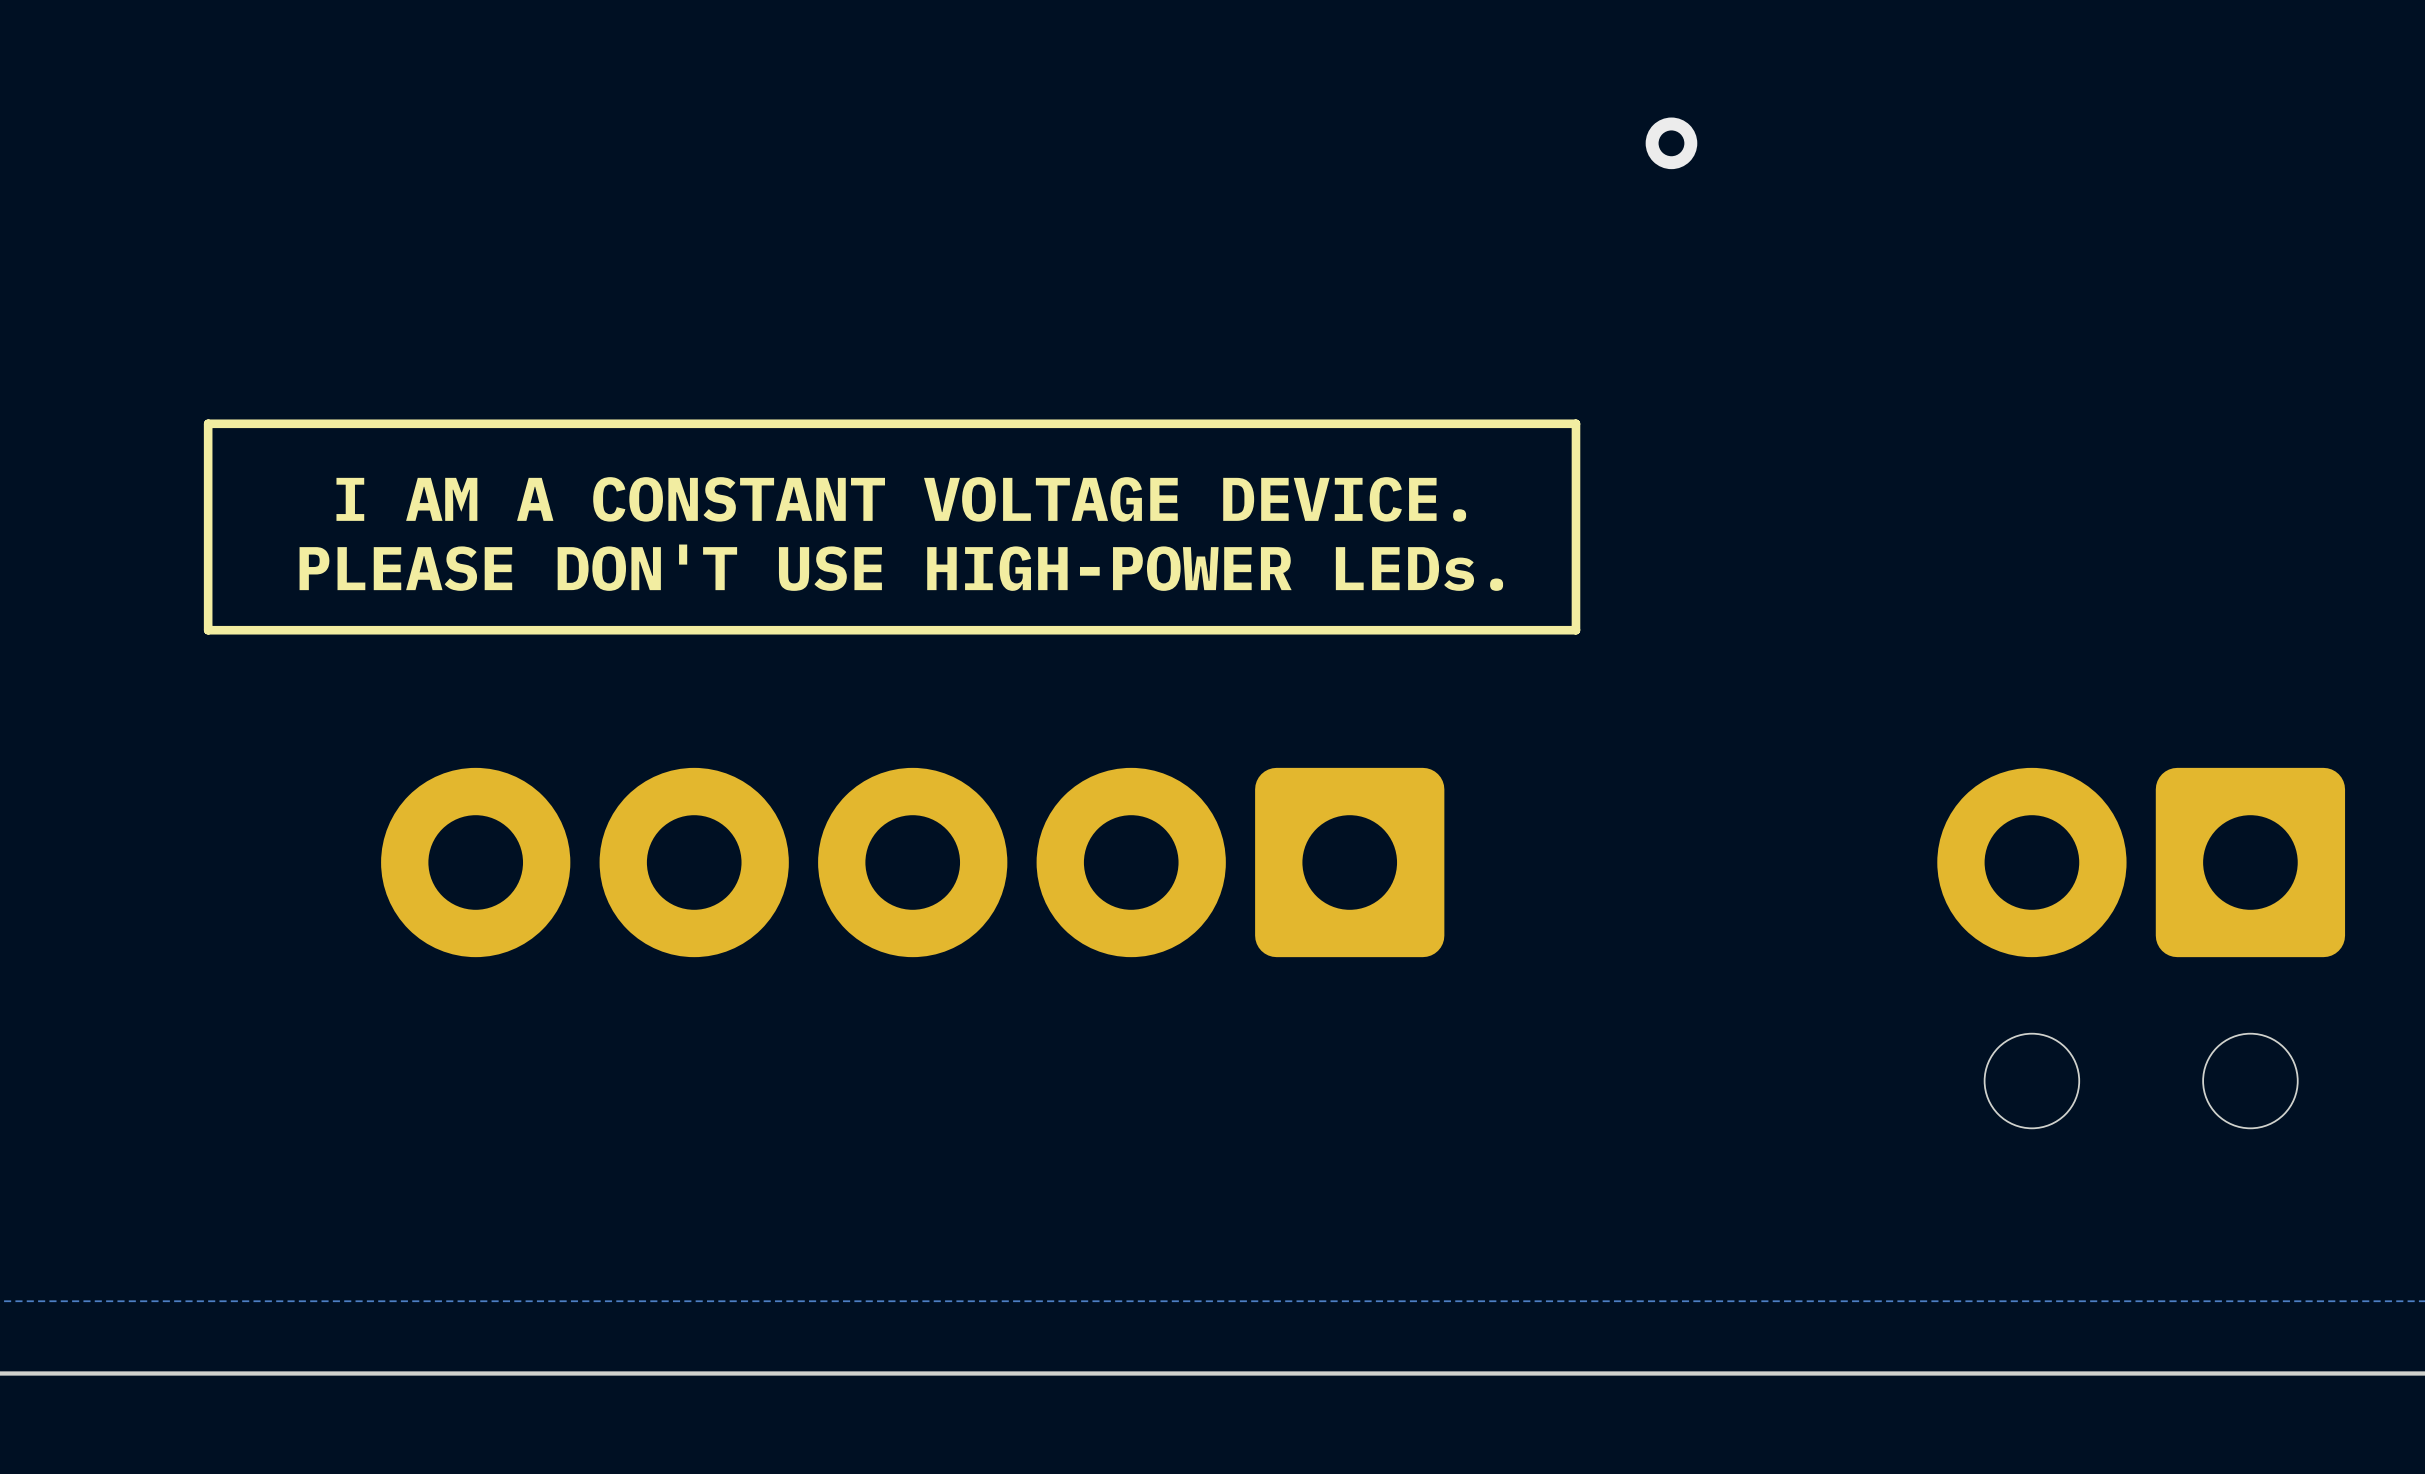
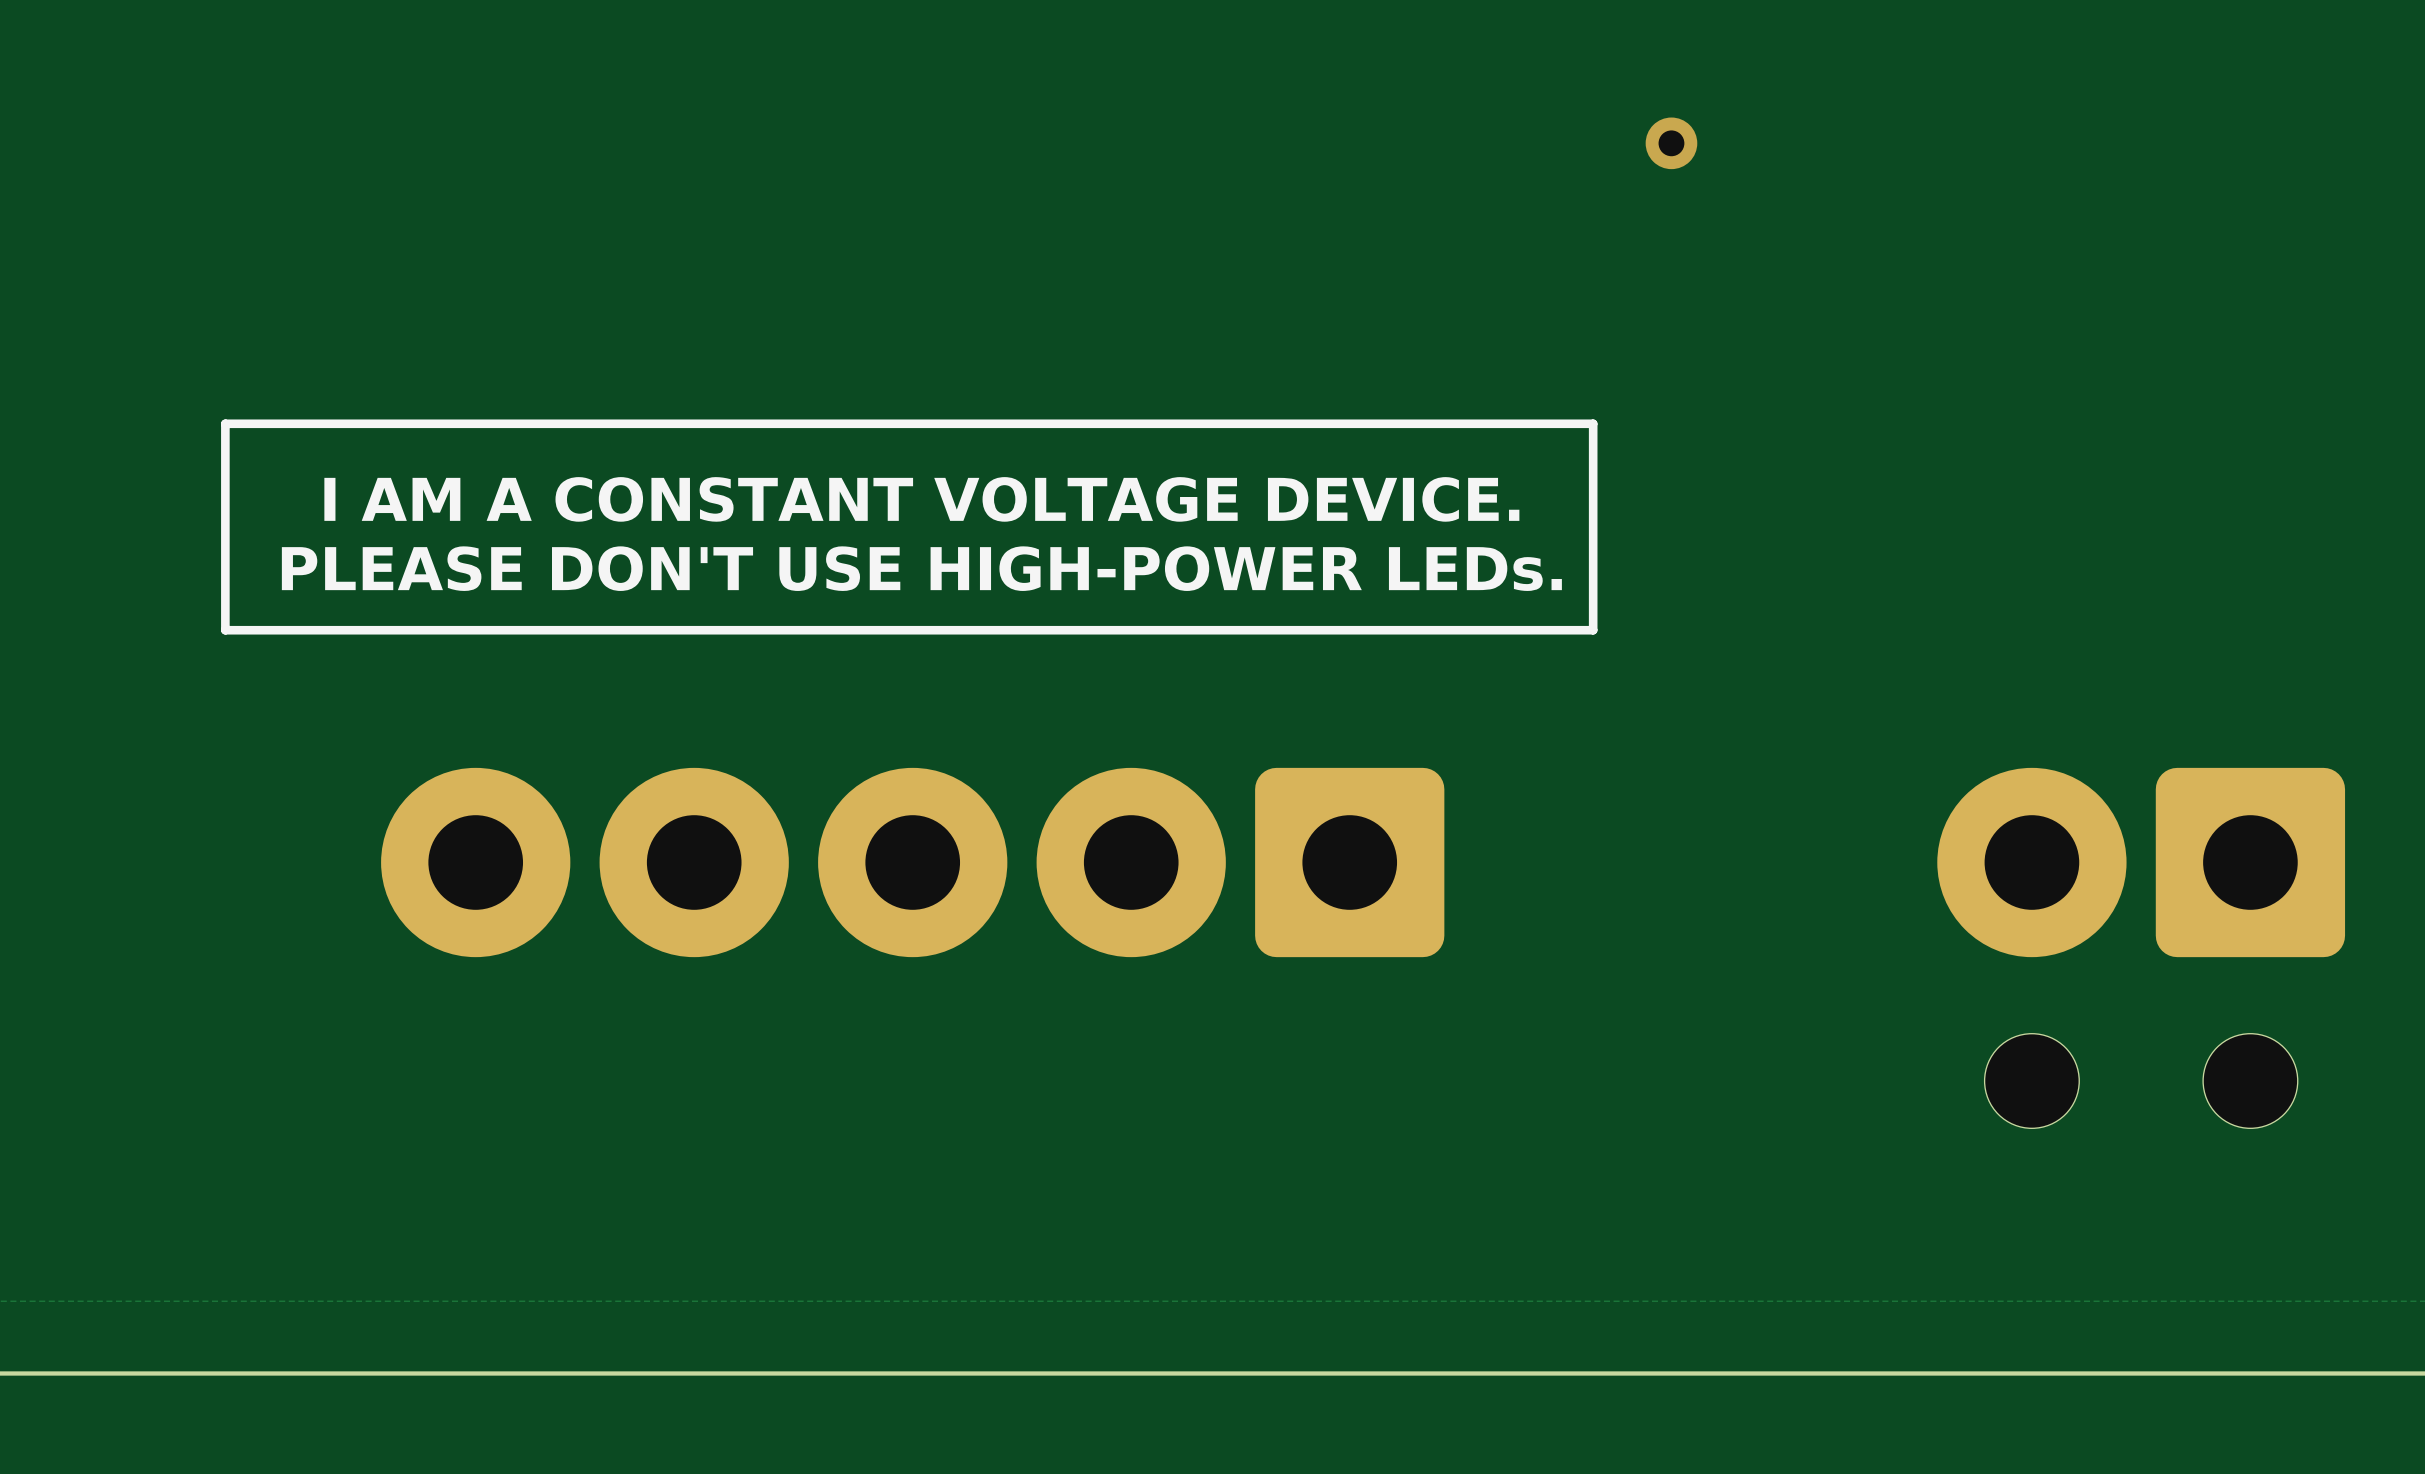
line: (225, 423) (208, 423) (208, 630) (225, 630) -> (225, 423) (225, 630)
line: (1575, 423) (1575, 630) -> (1575, 423) (1593, 423) (1593, 630) (1575, 630)
text position: I AM A CONSTANT VOLTAGE DEVICE. (901, 499) -> I AM A CONSTANT VOLTAGE DEVICE. (921, 499)
text position: PLEASE DON'T USE HIGH-POWER LEDs. (901, 567) -> PLEASE DON'T USE HIGH-POWER LEDs. (921, 568)

